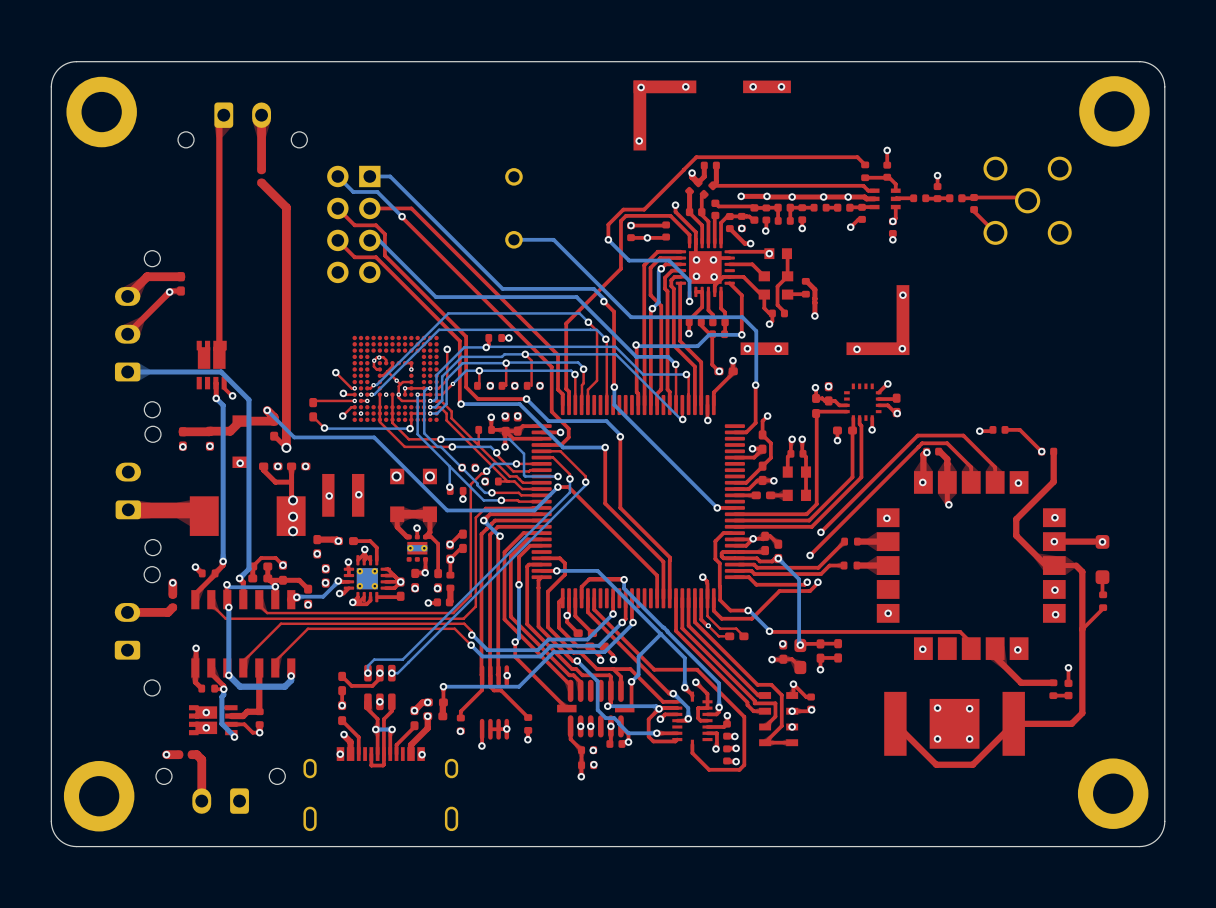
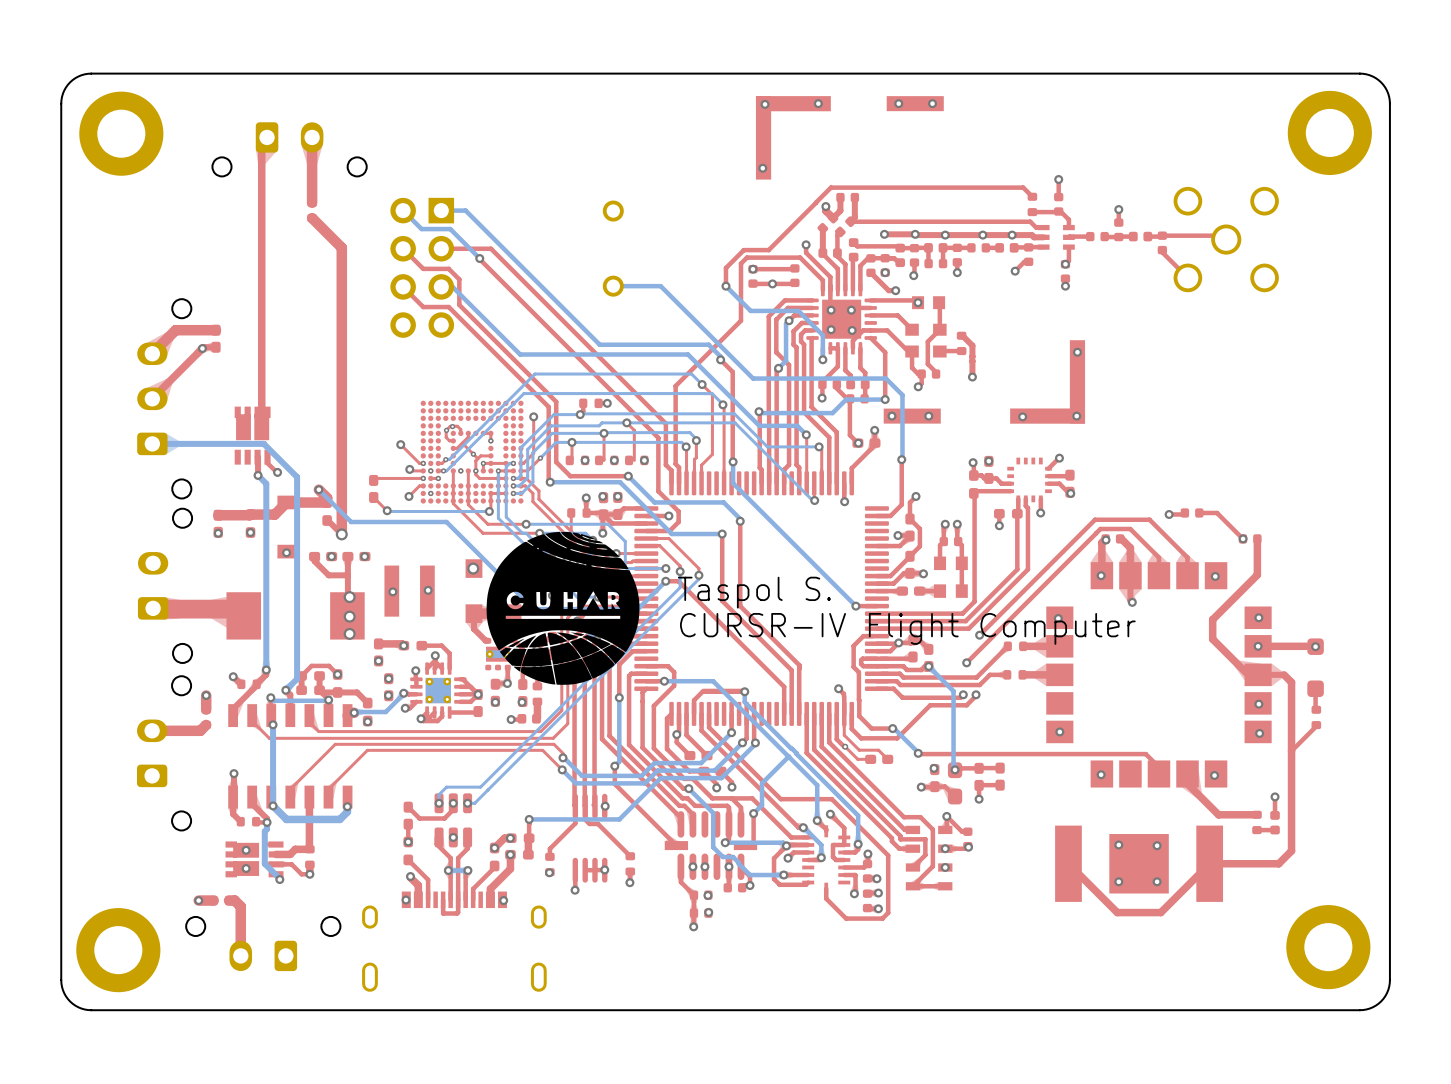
drawing: none -> [486, 531, 640, 685]
text: none -> Taspol S. (754, 592)
text: none -> CURSR-IV Flight Computer (907, 628)

